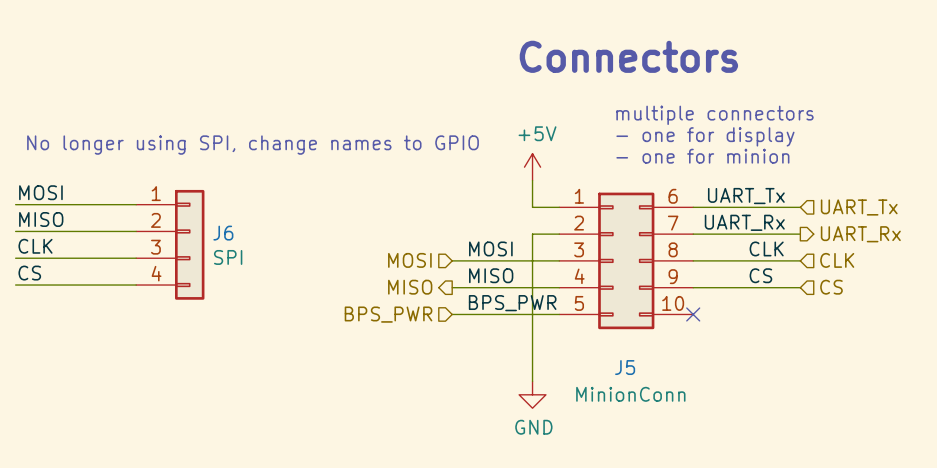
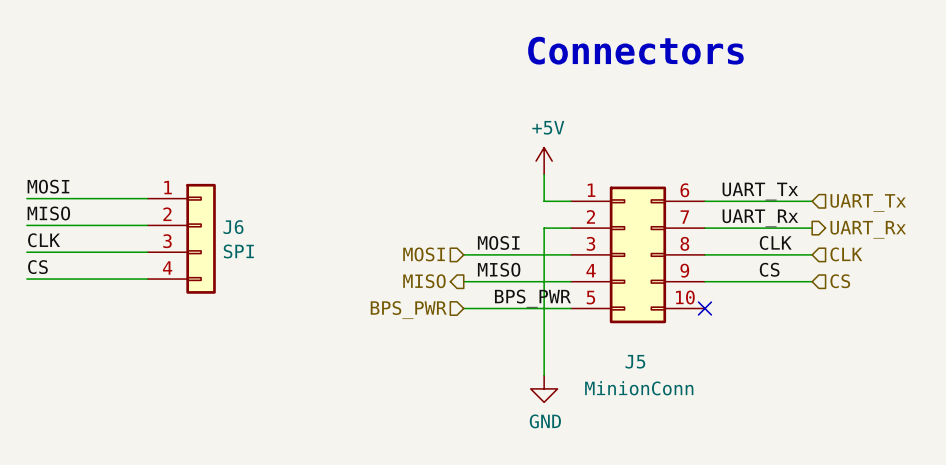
text: multiple connectors (715, 115) -> none
text: - one for display (705, 136) -> none
text: No longer using SPI, change names to GPIO (253, 145) -> none
text: - one for minion (702, 156) -> none

